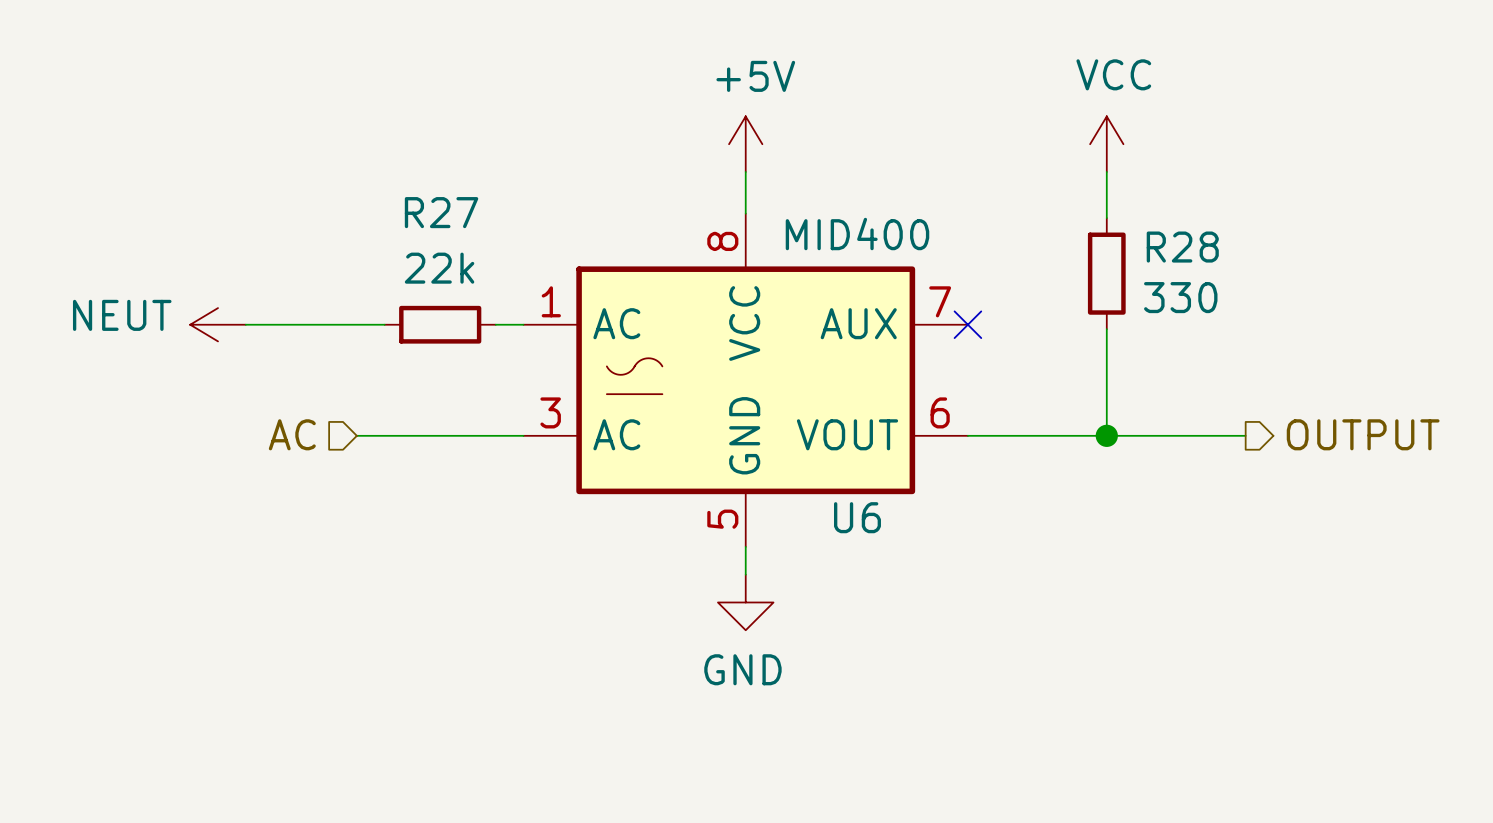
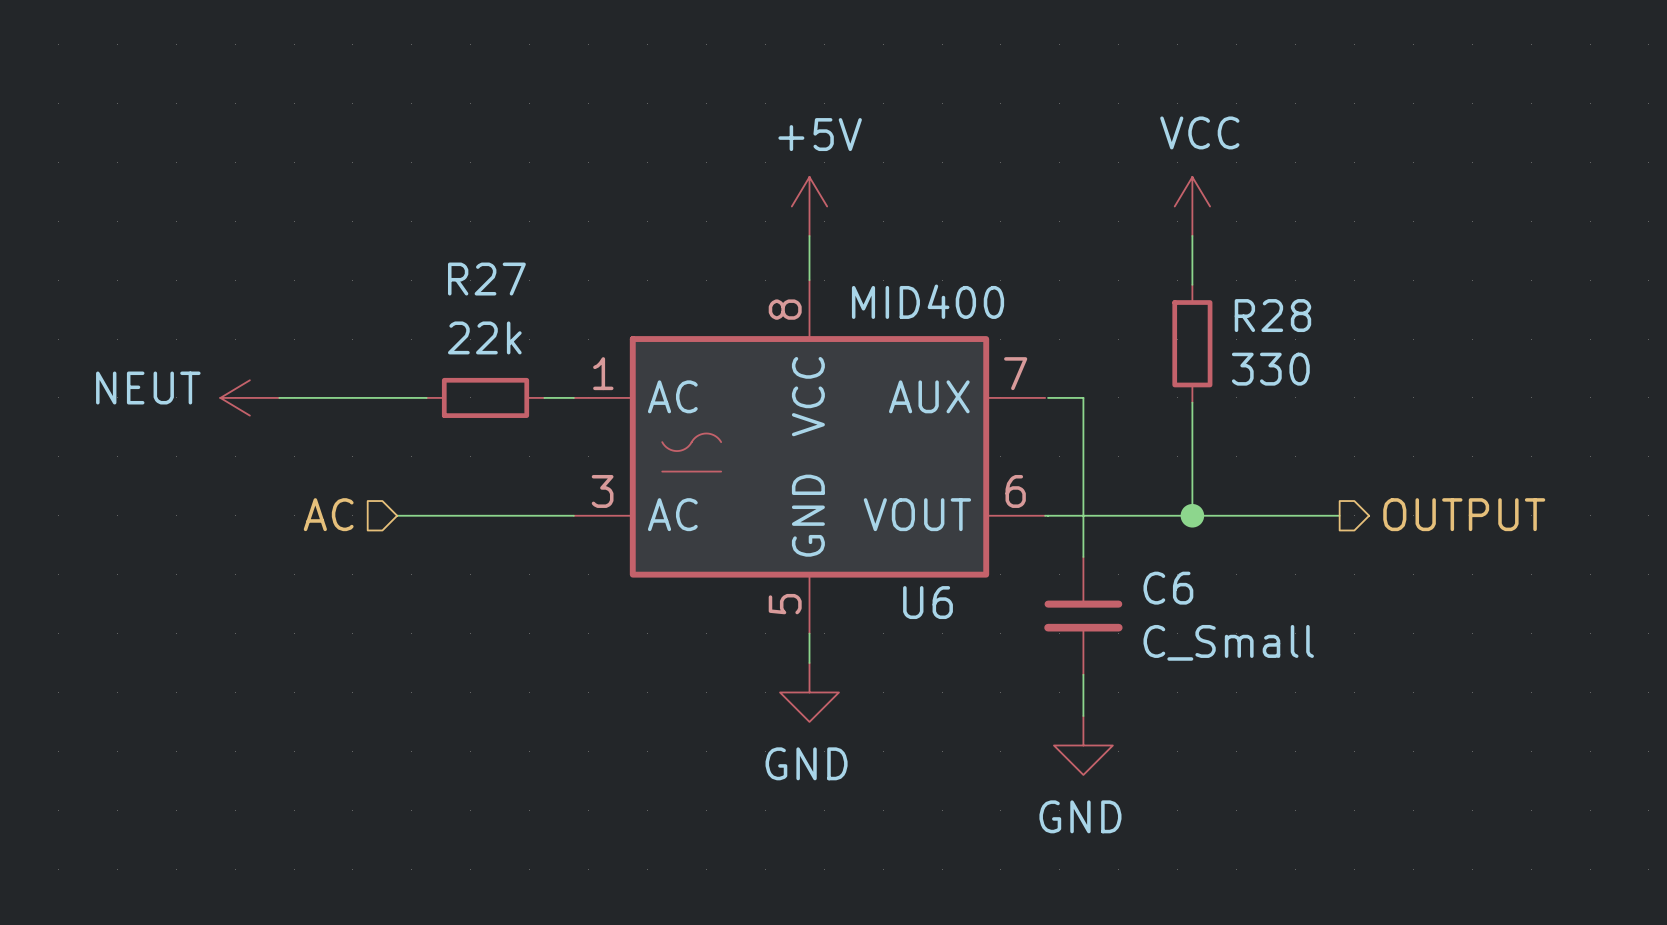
no-connect mark: (967, 324) -> none
wire: none -> (1048, 397) (1083, 397) (1083, 556)
C6: none -> C_Small (1083, 615)
wire: none -> (1083, 674) (1083, 716)
power symbol: none -> GND (1083, 745)

